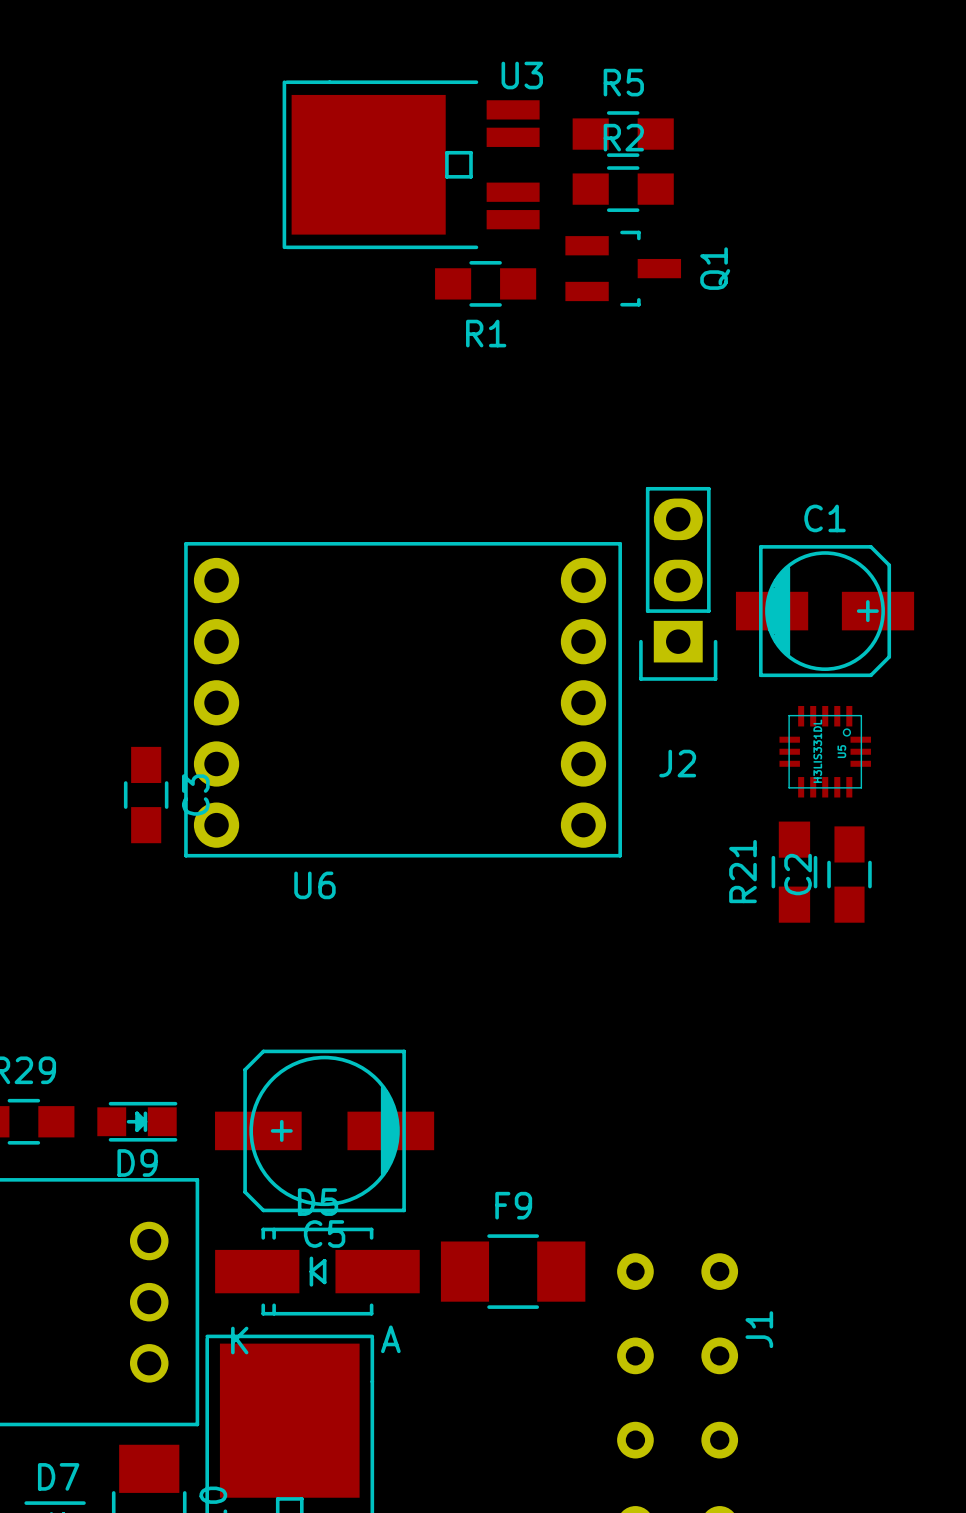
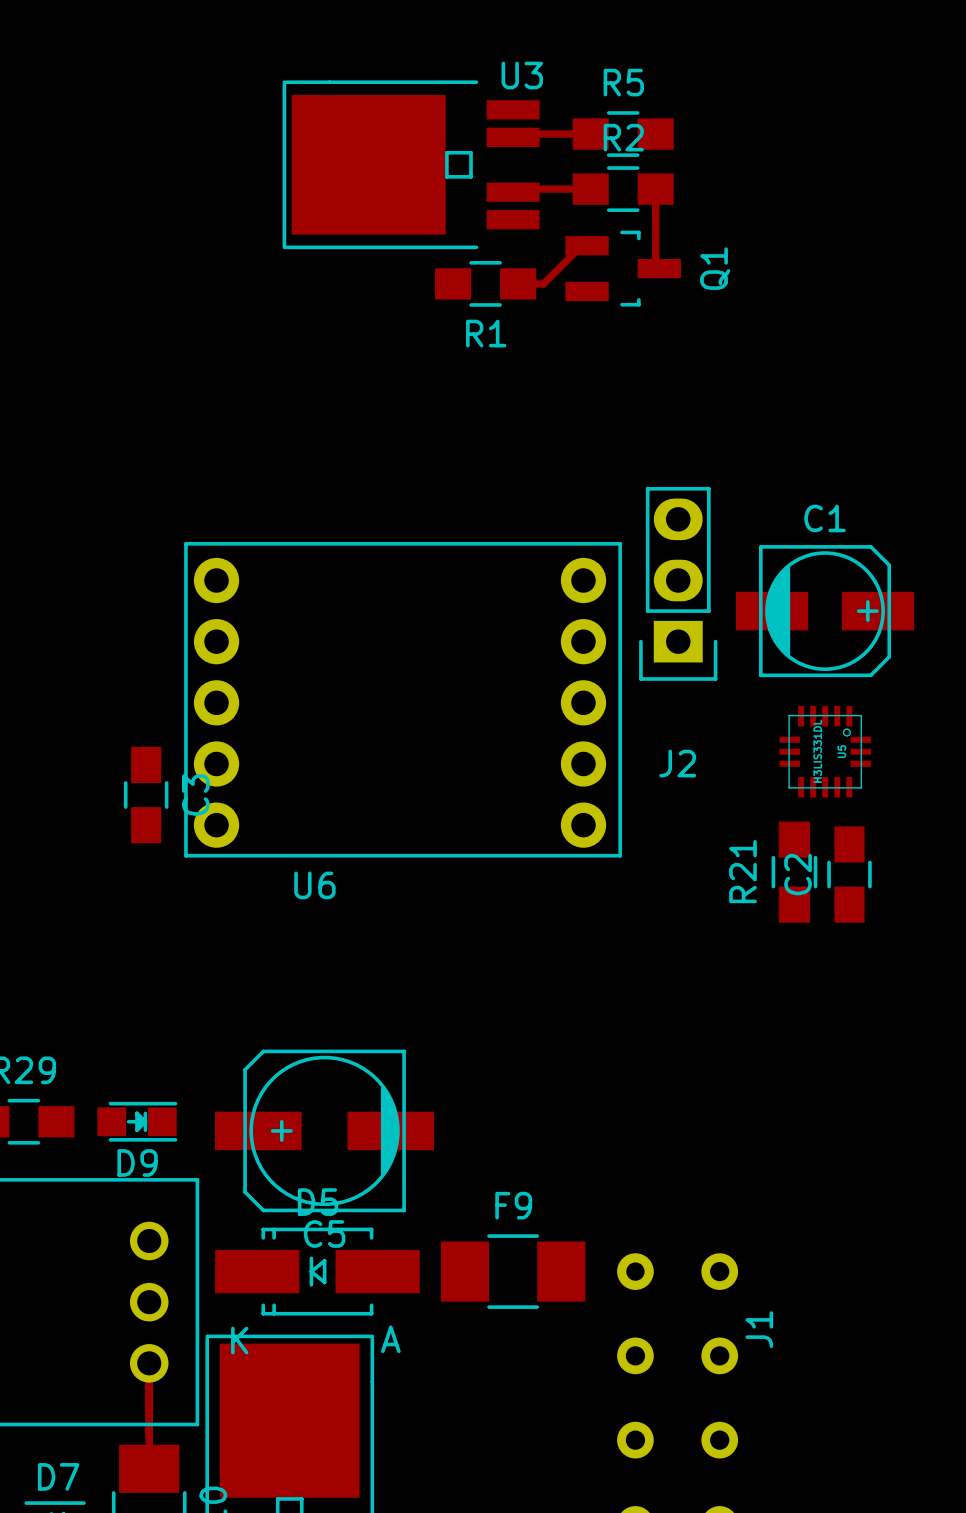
track: none -> (590, 134) (516, 134) (513, 137)
track: none -> (590, 189) (516, 189) (513, 192)
track: none -> (655, 189) (655, 264) (659, 268)
track: none -> (587, 245) (581, 245) (543, 283) (518, 283)
track: none -> (149, 1363) (149, 1468)

